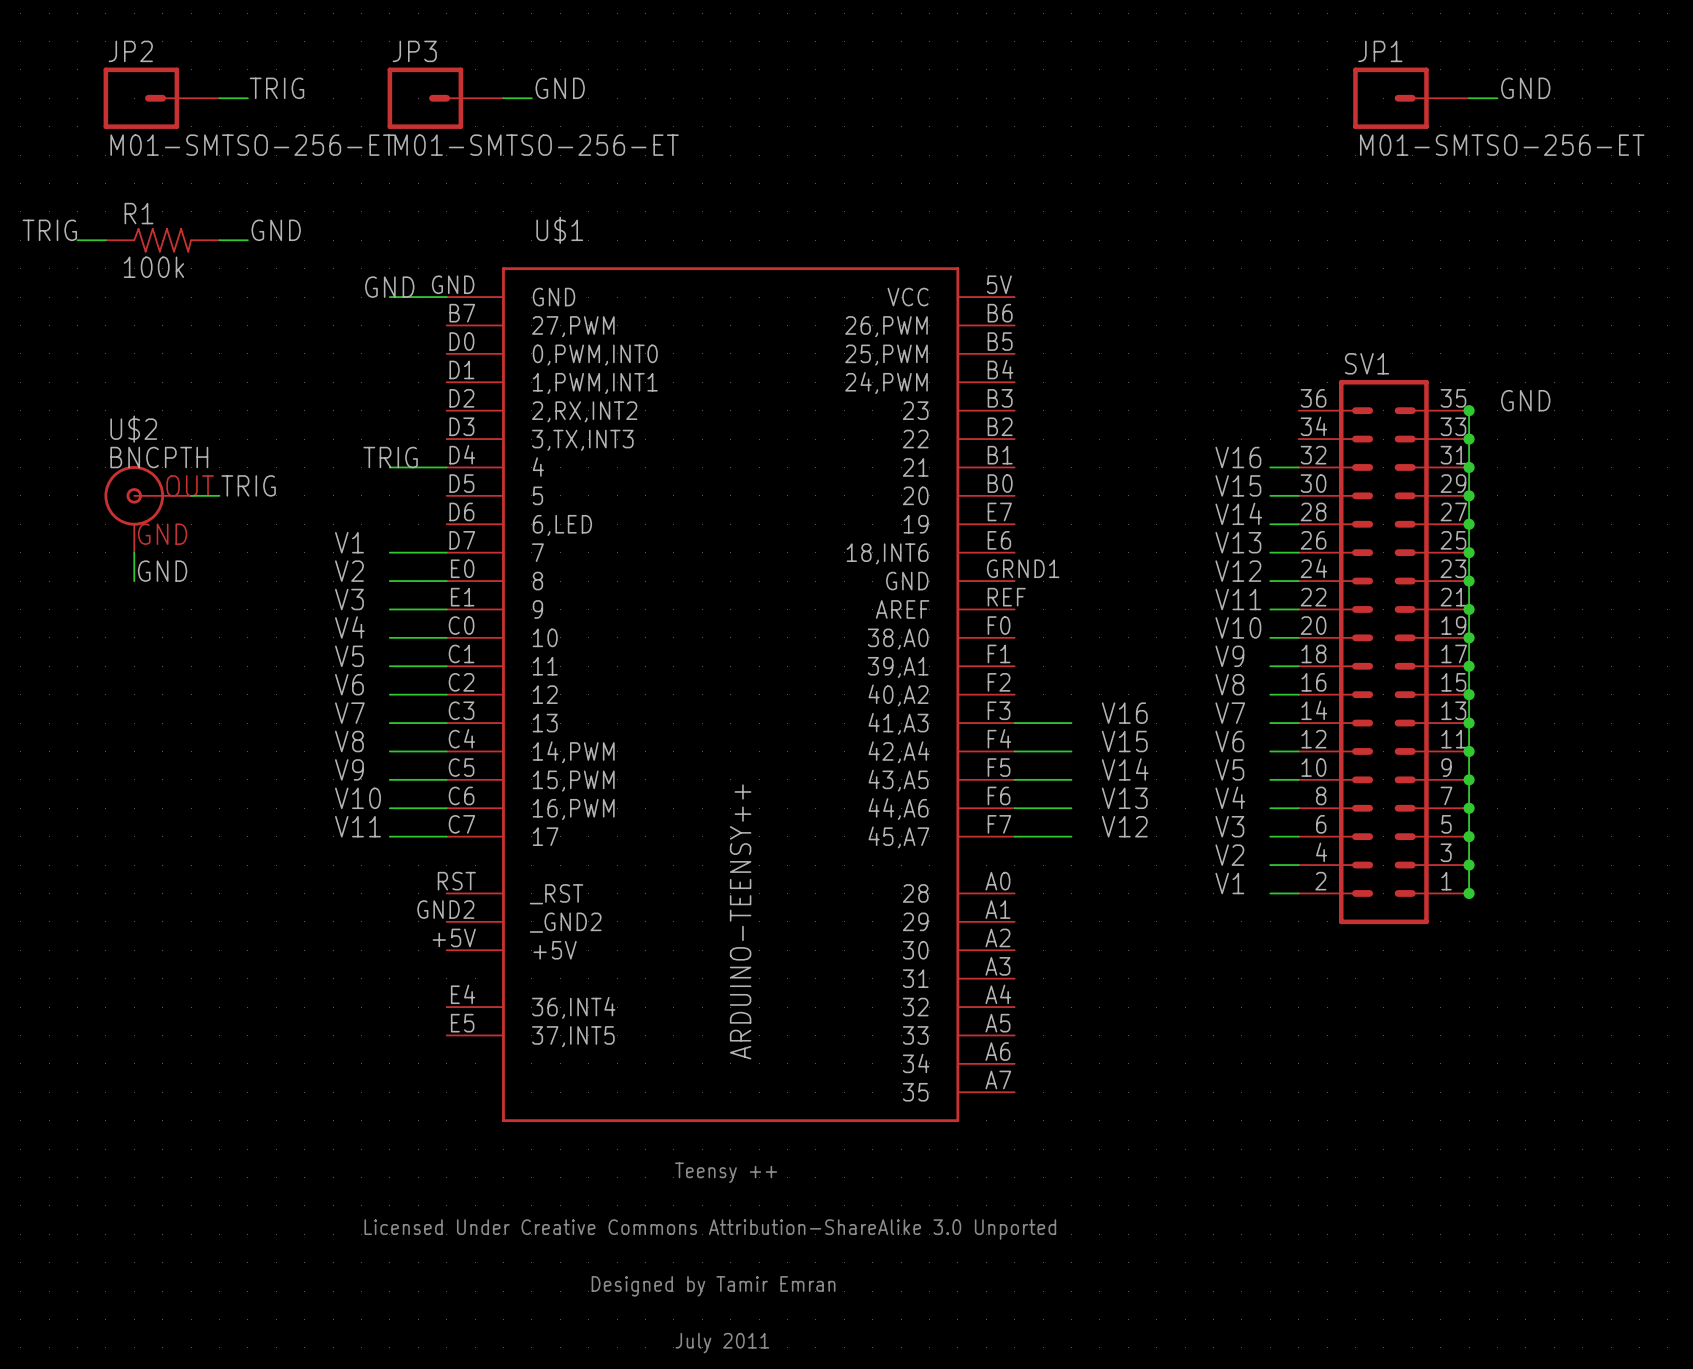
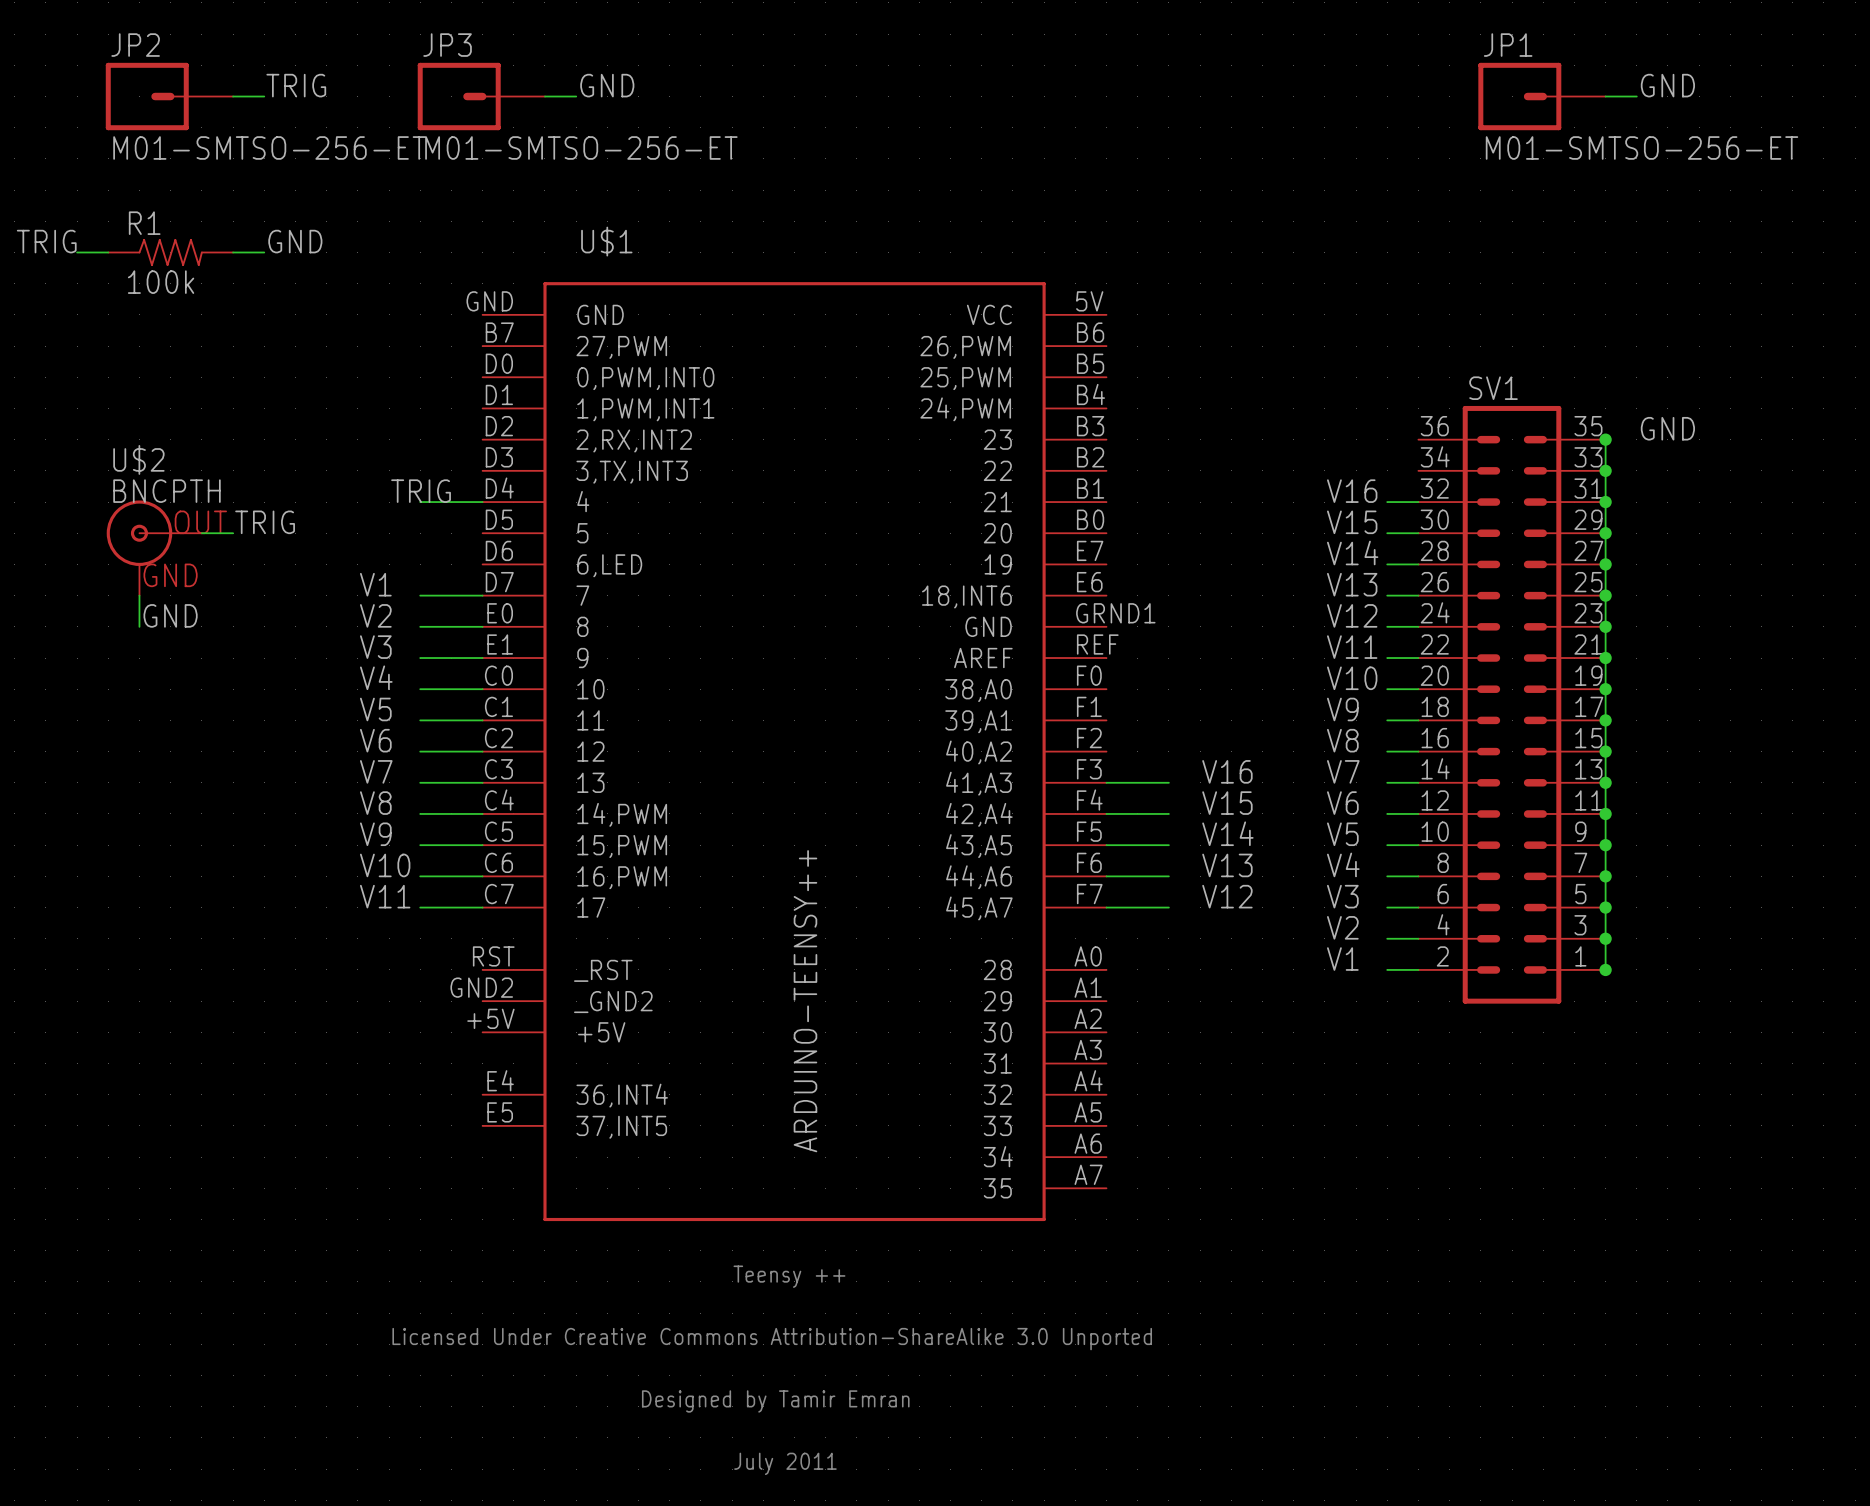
label: GND (389, 287) -> none
wire: (389, 297) (446, 297) -> none

